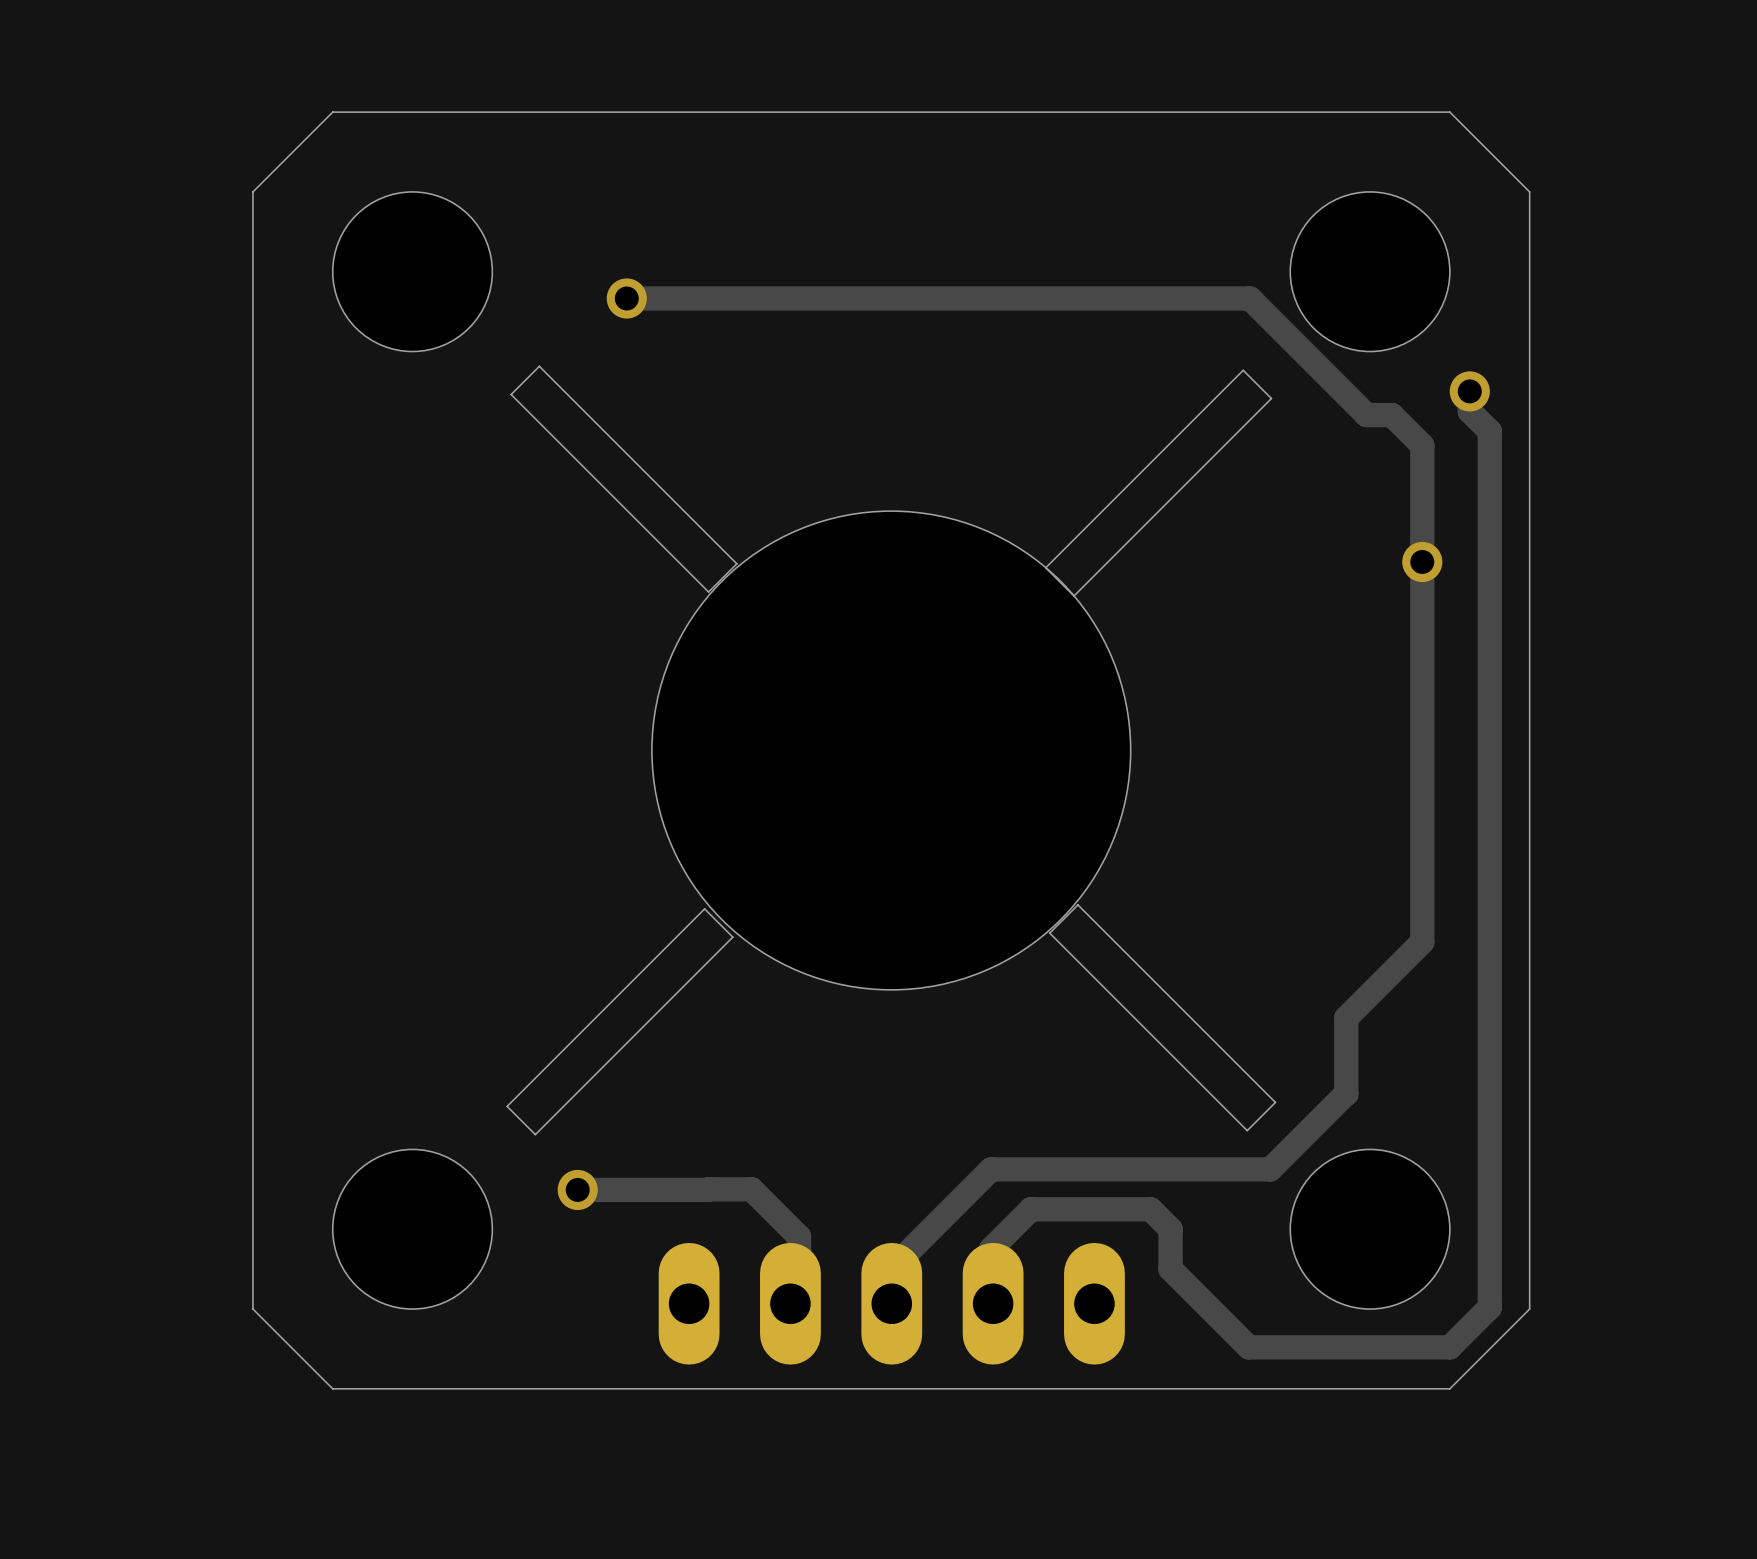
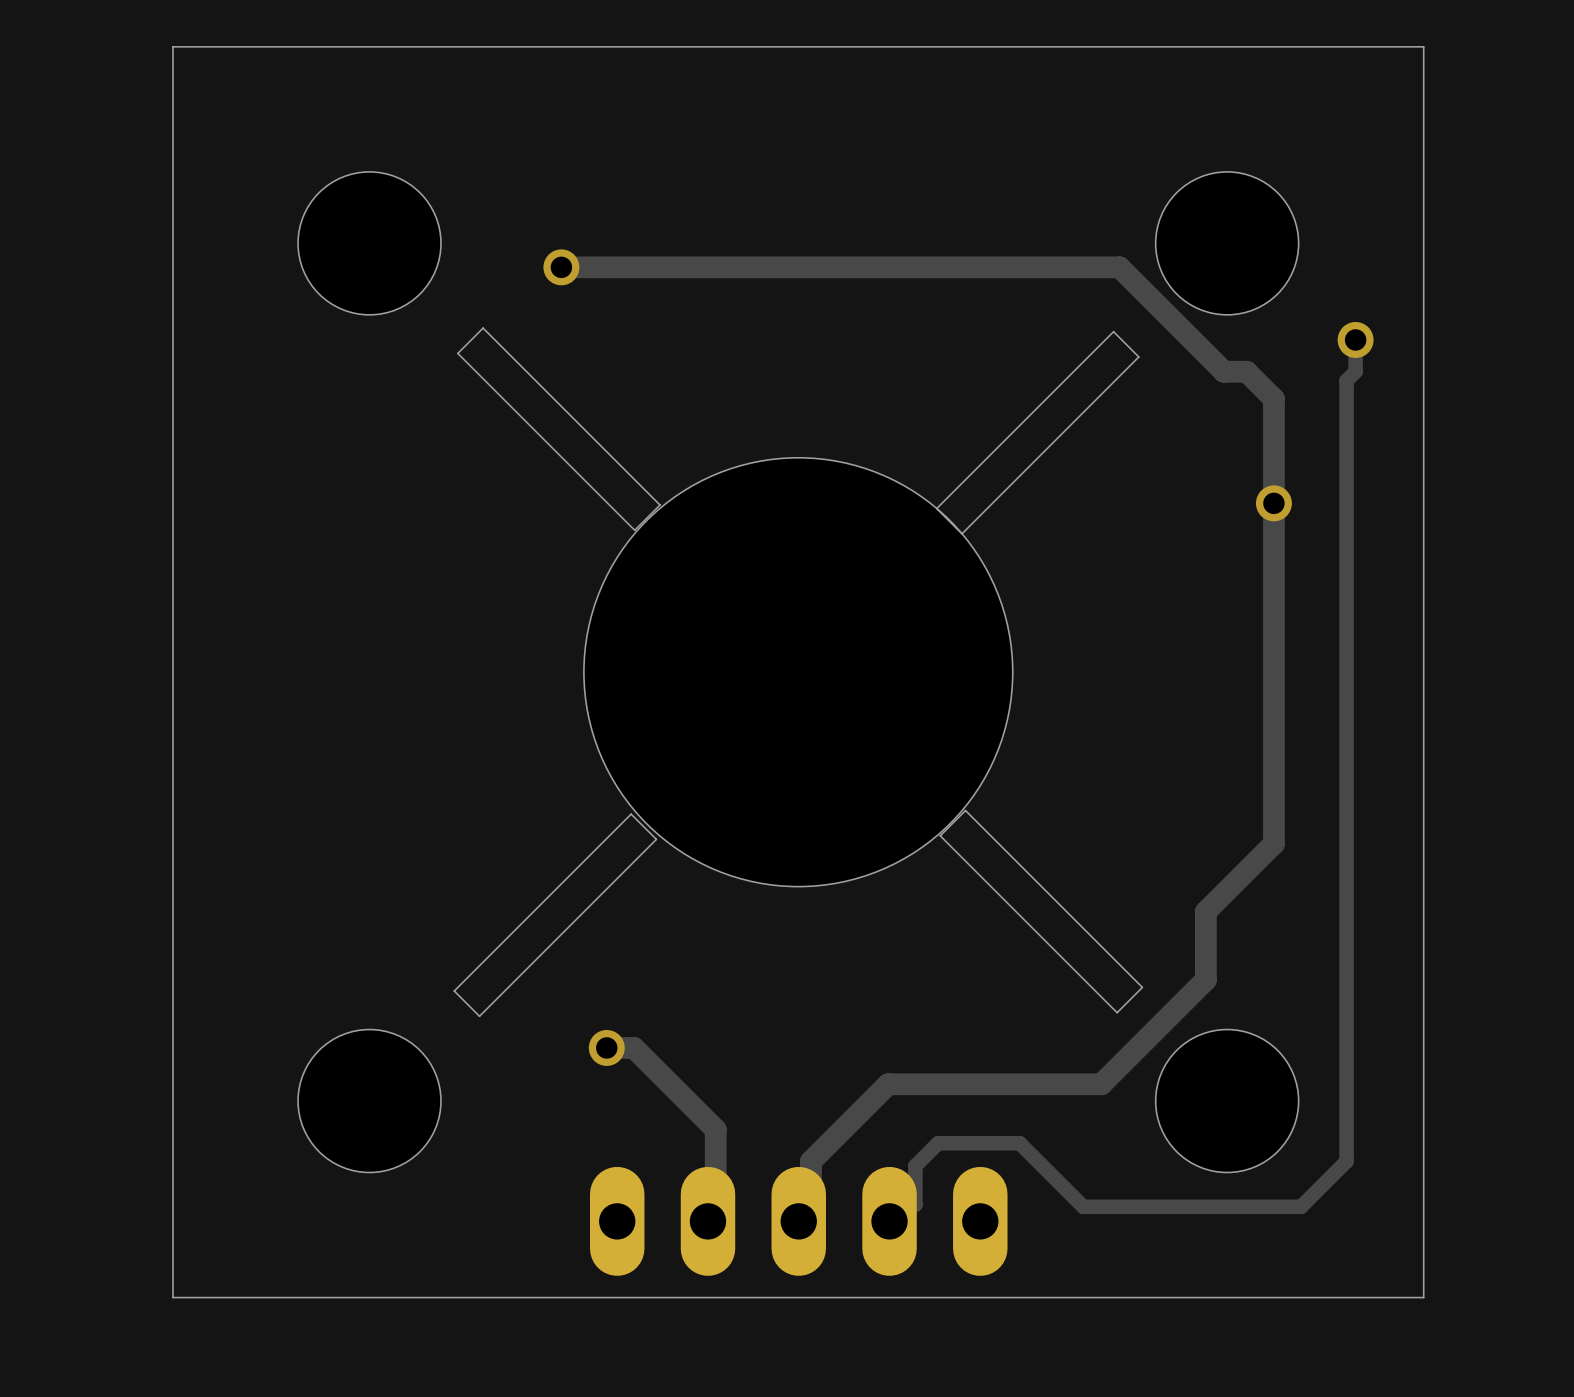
board edge: (1449, 112) (332, 112) (252, 191) (252, 1309) (332, 1388) (1449, 1388) (1529, 1309) (1529, 191) (1449, 112) -> (1423, 46) (1423, 1297) (172, 1297) (172, 46) (1423, 46)
track: none -> (1355, 339) (1355, 371) (1346, 380) (1346, 1161) (1301, 1206)
track: (1469, 391) (1469, 411) (1489, 431) (1489, 1307) (1449, 1347) -> none
via position: (1469, 391) -> (1355, 339)
track: (1345, 1093) (1270, 1169) (991, 1169) (905, 1254) (905, 1296) (898, 1303) (891, 1303) -> (1205, 979) (1101, 1084) (888, 1084) (811, 1161) (811, 1218) (798, 1221)
track: (577, 1189) (751, 1189) (799, 1236) (799, 1261) -> (606, 1047) (634, 1047) (715, 1129)
via position: (577, 1189) -> (606, 1047)
part position: (891, 1303) -> (798, 1221)
track: (993, 1303) (991, 1301) (991, 1249) (1030, 1209) (1150, 1209) (1170, 1229) (1170, 1269) (1248, 1347) -> (889, 1221) (915, 1204) (915, 1165) (938, 1143) (1019, 1143) (1083, 1206) (1118, 1206)
track width: thick (1449, 1347) (1248, 1347) -> thin (1298, 1206) (1118, 1206)

